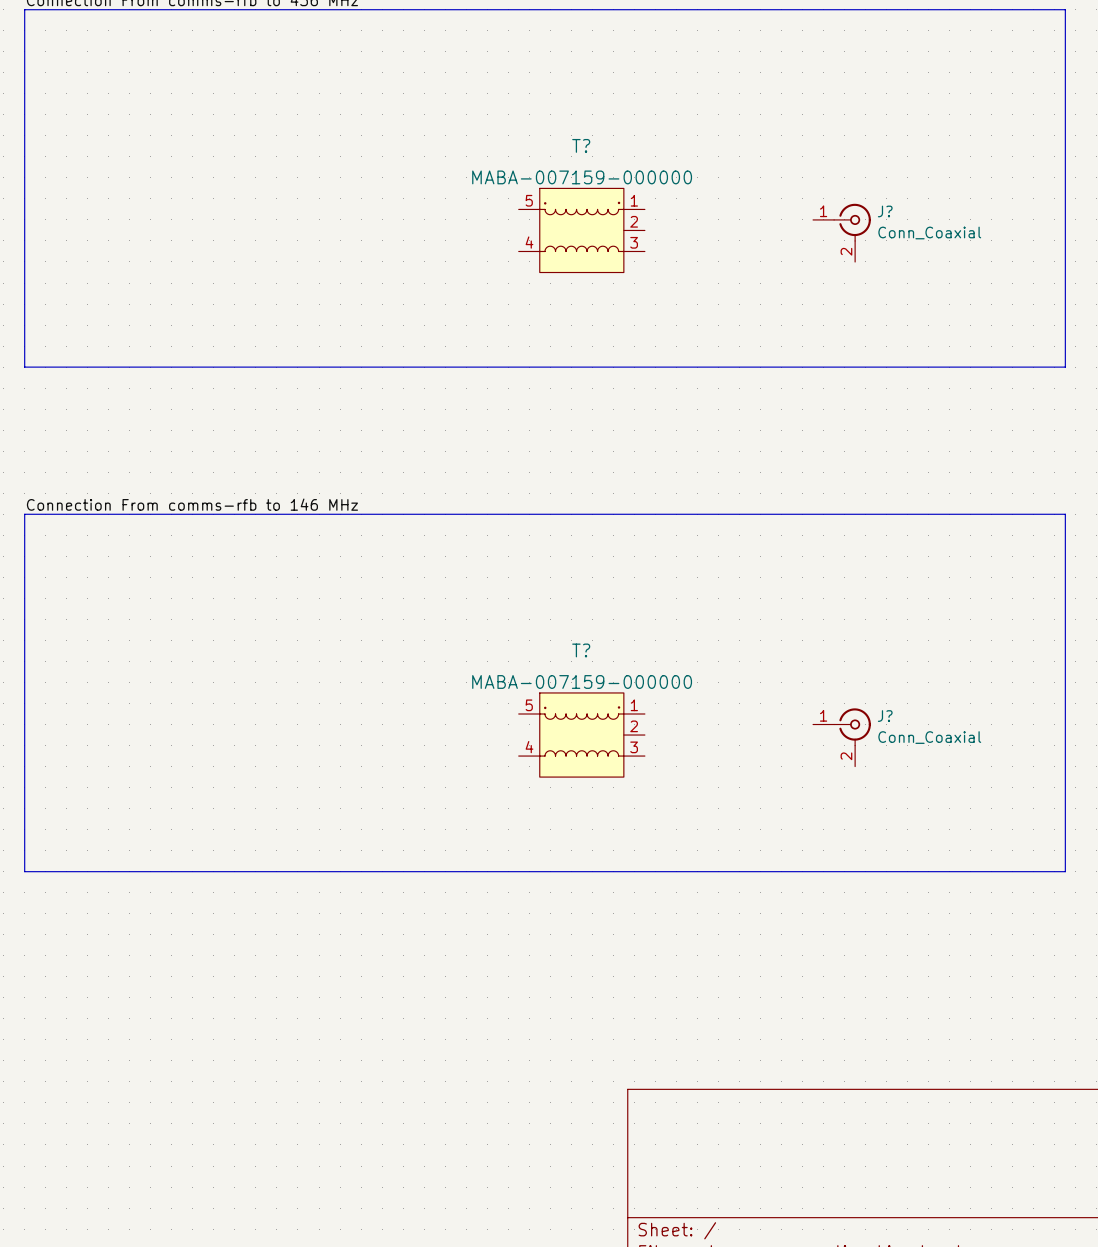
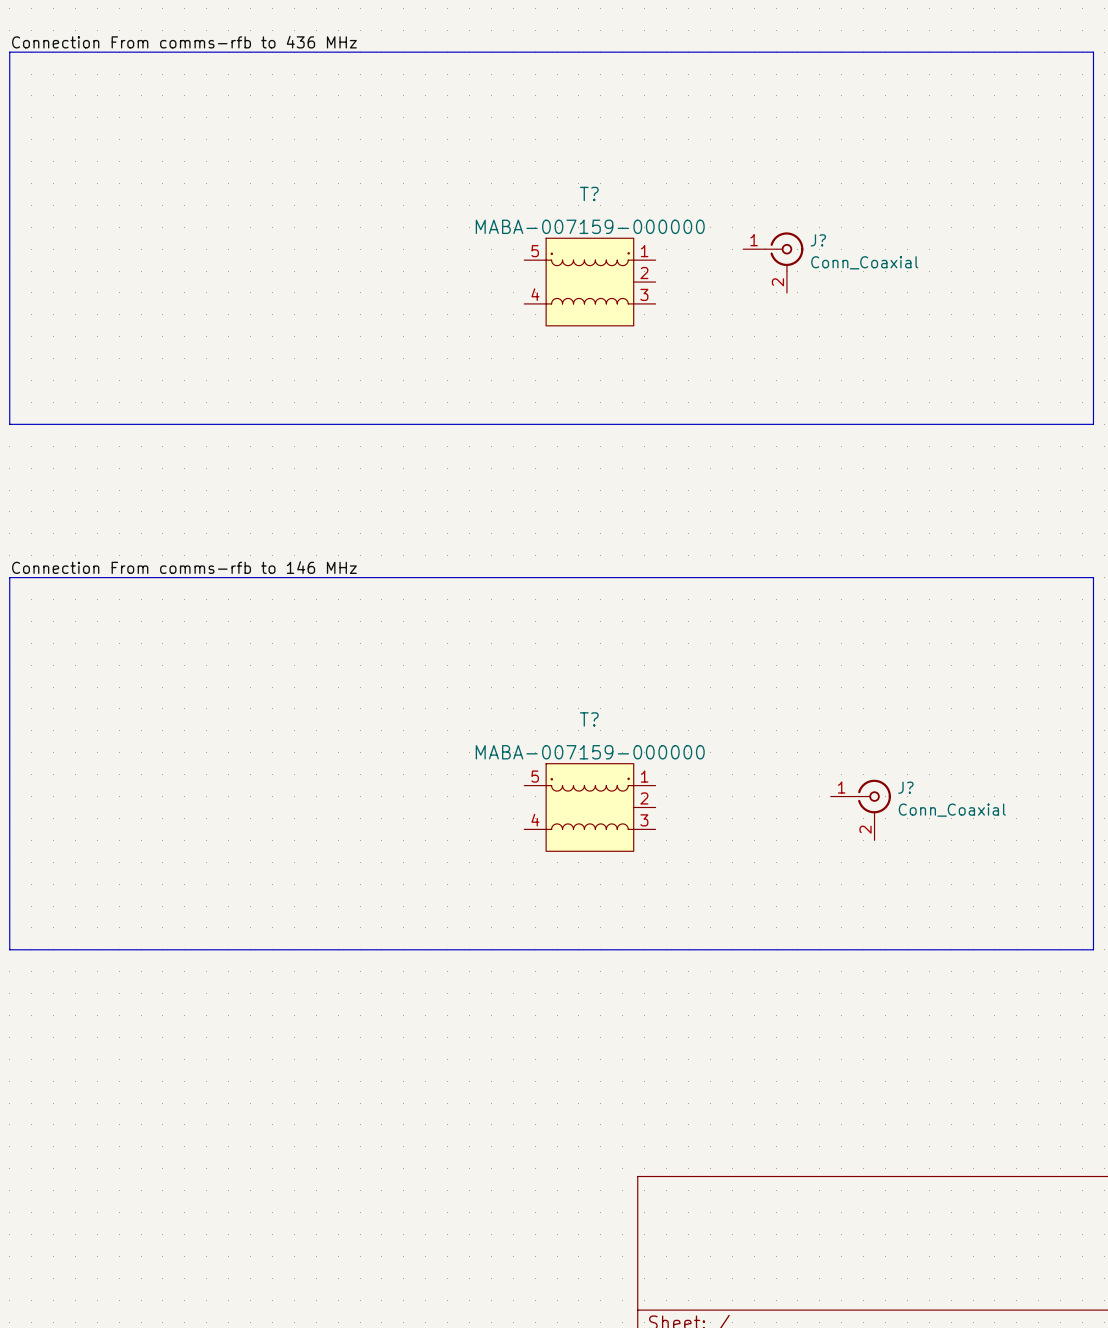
J? position: (841, 232) -> (773, 262)

